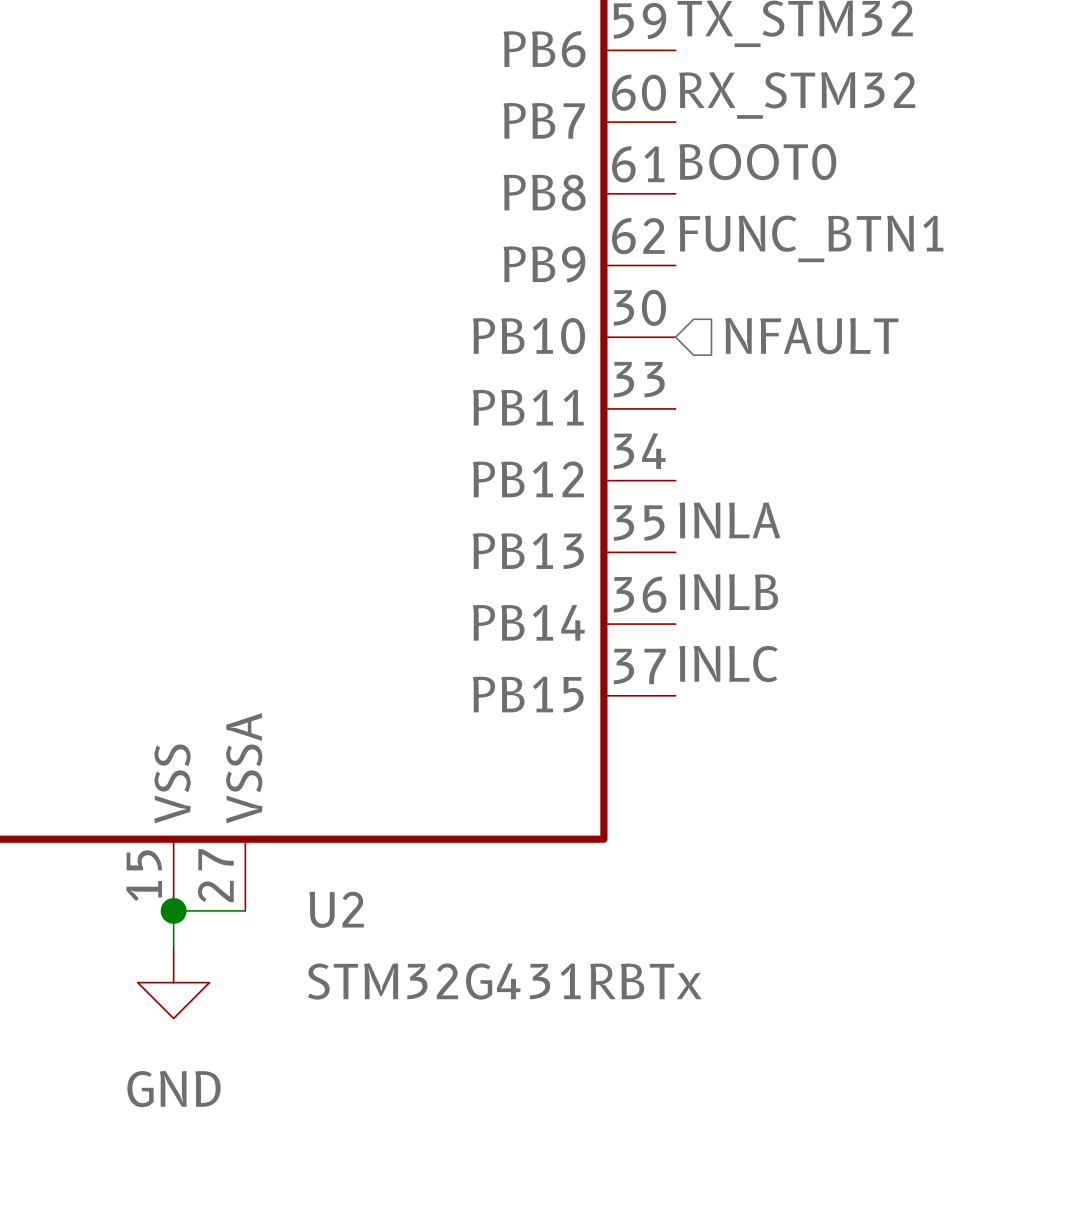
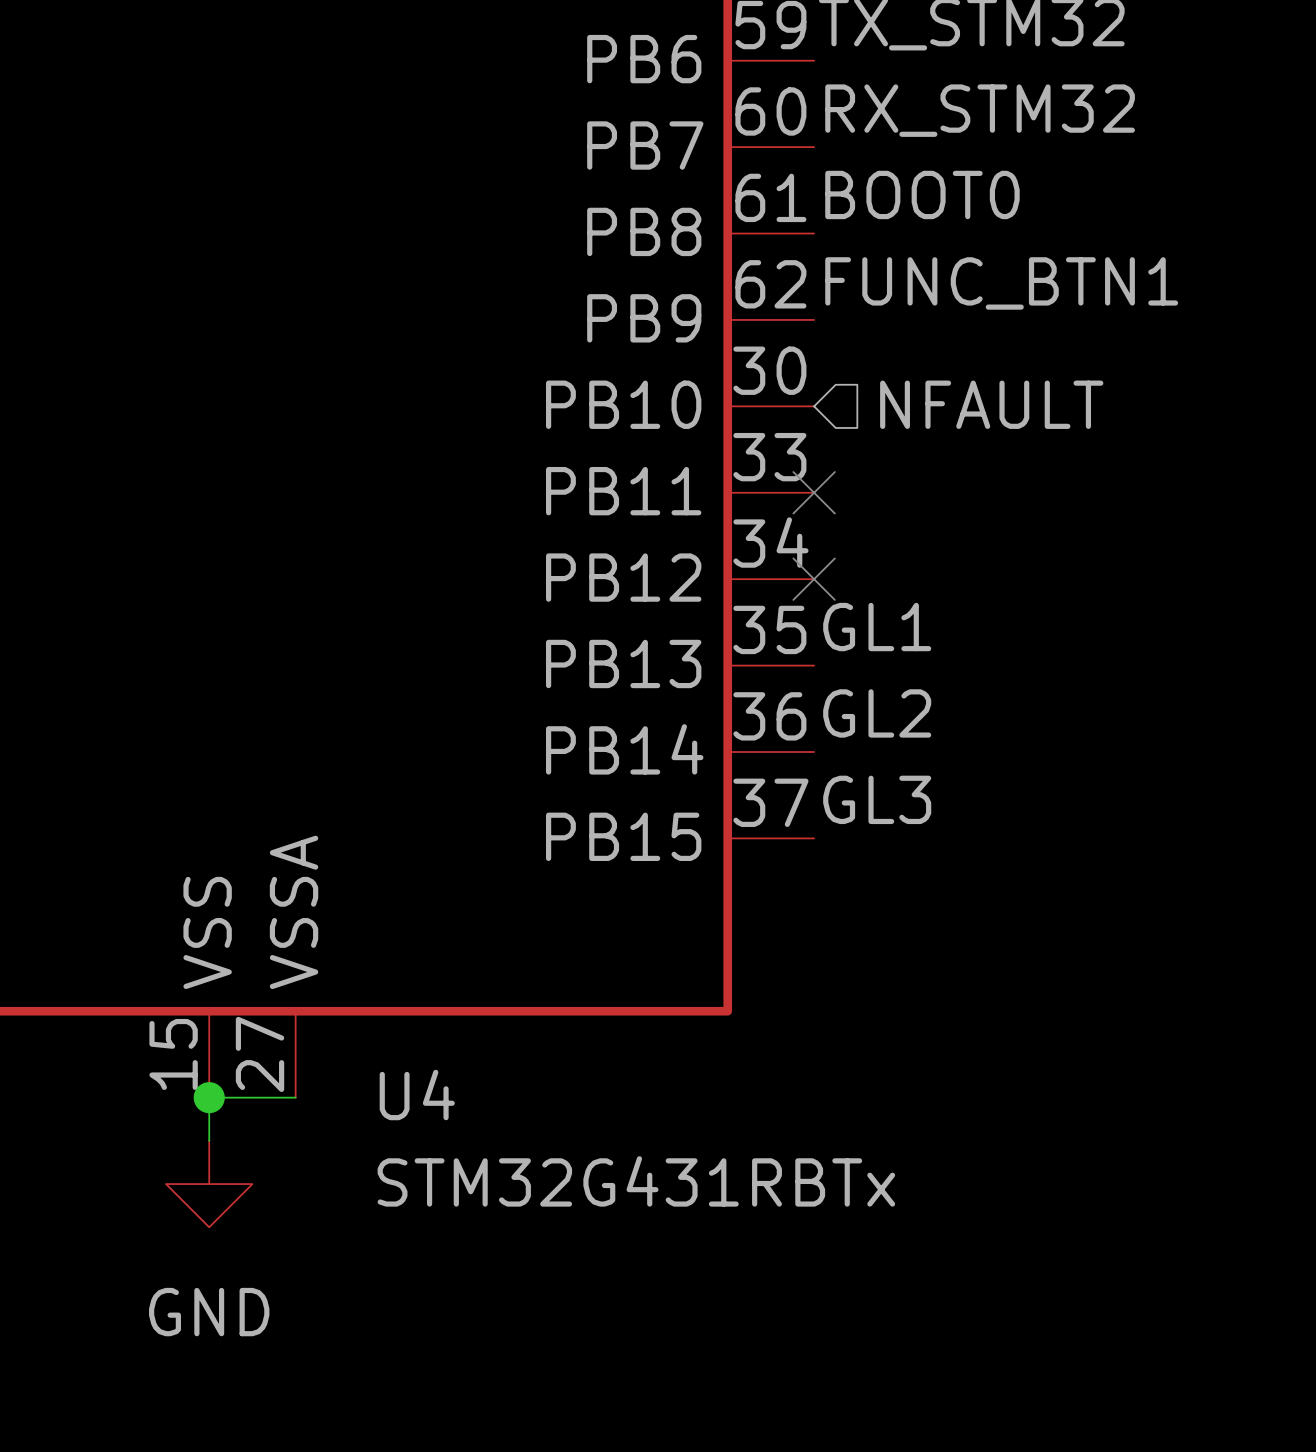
no-connect mark: none -> (814, 492)
no-connect mark: none -> (814, 579)
label: INLA (729, 520) -> GL1 (877, 627)
label: INLB (728, 592) -> GL2 (877, 713)
label: INLC (728, 663) -> GL3 (877, 799)
U2 name: U2 (336, 909) -> U4 (417, 1095)

